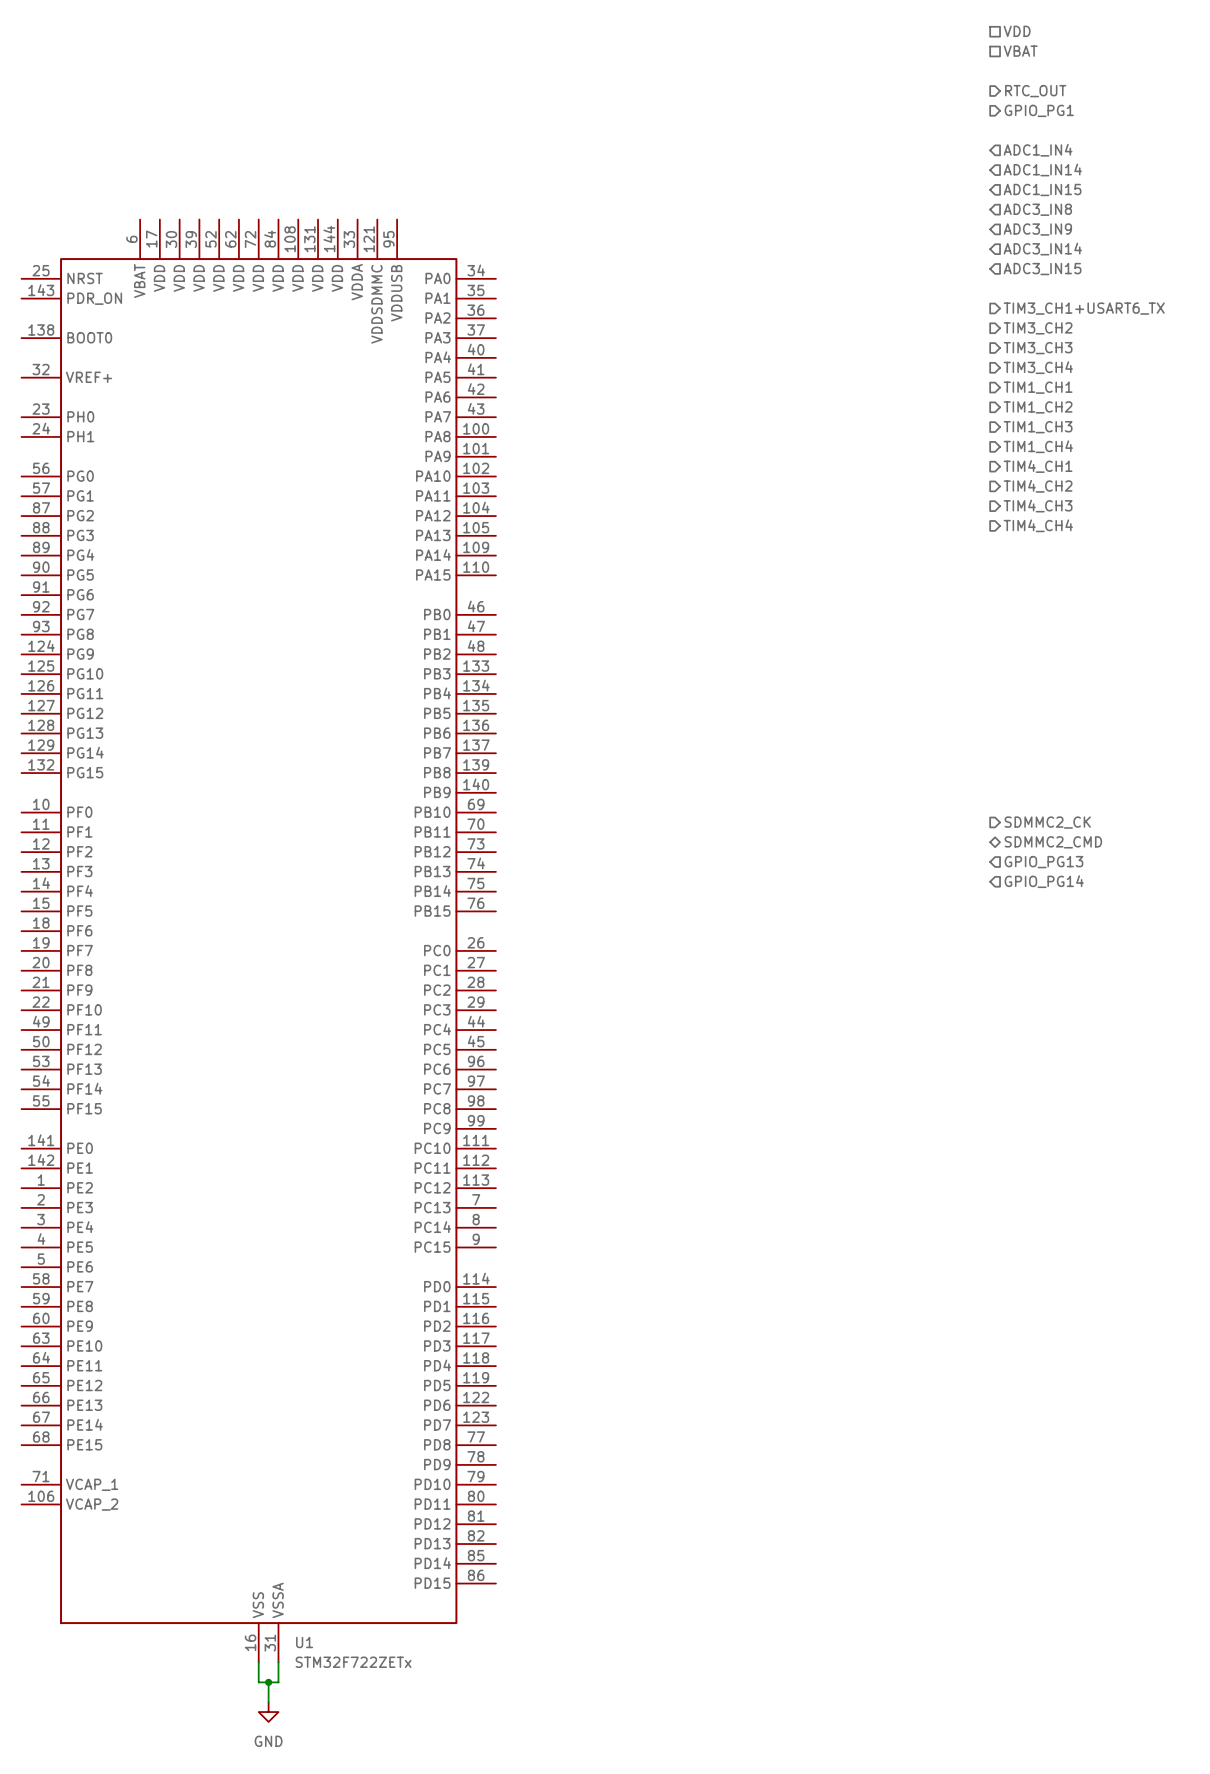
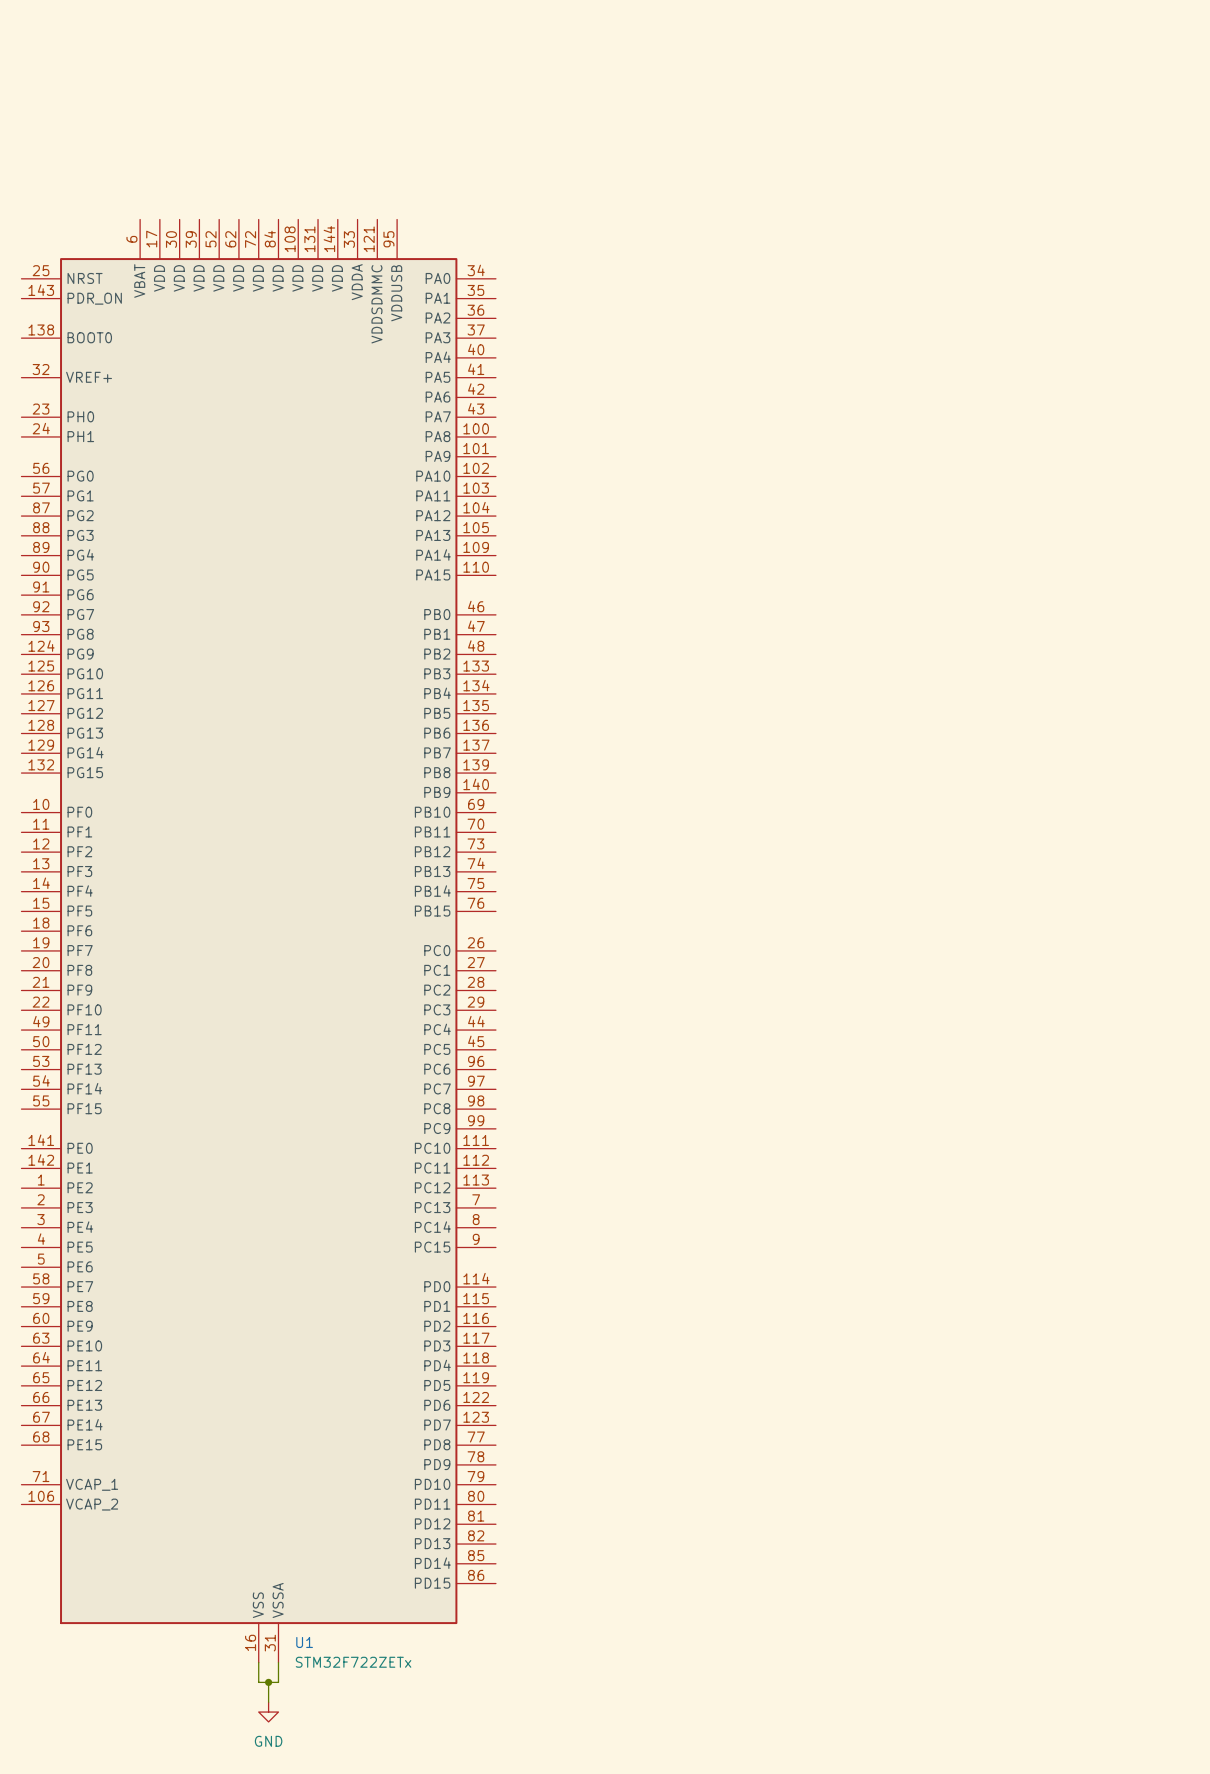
hierarchical label: VDD (1017, 31) -> none
hierarchical label: VBAT (1020, 51) -> none
hierarchical label: RTC_OUT (1035, 91) -> none
hierarchical label: GPIO_PG1 (1039, 110) -> none
hierarchical label: ADC1_IN4 (1038, 150) -> none
hierarchical label: ADC1_IN14 (1042, 169) -> none
hierarchical label: ADC1_IN15 (1042, 189) -> none
hierarchical label: ADC3_IN8 (1037, 209) -> none
hierarchical label: ADC3_IN9 (1037, 229) -> none
hierarchical label: ADC3_IN14 (1042, 249) -> none
hierarchical label: ADC3_IN15 (1042, 269) -> none
hierarchical label: TIM3_CH1+USART6_TX (1084, 308) -> none
hierarchical label: TIM3_CH2 (1038, 328) -> none
hierarchical label: TIM3_CH3 (1038, 348) -> none
hierarchical label: TIM3_CH4 (1038, 367) -> none
hierarchical label: TIM1_CH1 (1038, 387) -> none
hierarchical label: TIM1_CH2 (1038, 407) -> none
hierarchical label: TIM1_CH3 (1038, 427) -> none
hierarchical label: TIM1_CH4 (1038, 446) -> none
hierarchical label: TIM4_CH1 (1038, 466) -> none
hierarchical label: TIM4_CH2 (1038, 486) -> none
hierarchical label: TIM4_CH3 (1038, 506) -> none
hierarchical label: TIM4_CH4 (1038, 525) -> none
hierarchical label: SDMMC2_CK (1047, 822) -> none
hierarchical label: SDMMC2_CMD (1053, 842) -> none
hierarchical label: GPIO_PG13 (1043, 862) -> none
hierarchical label: GPIO_PG14 (1044, 881) -> none

